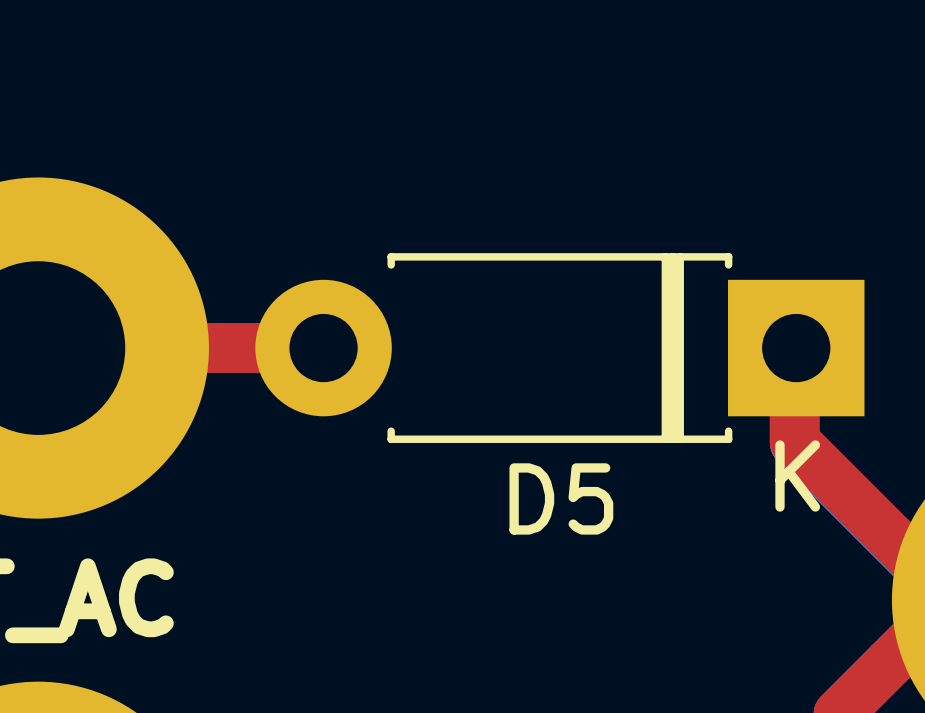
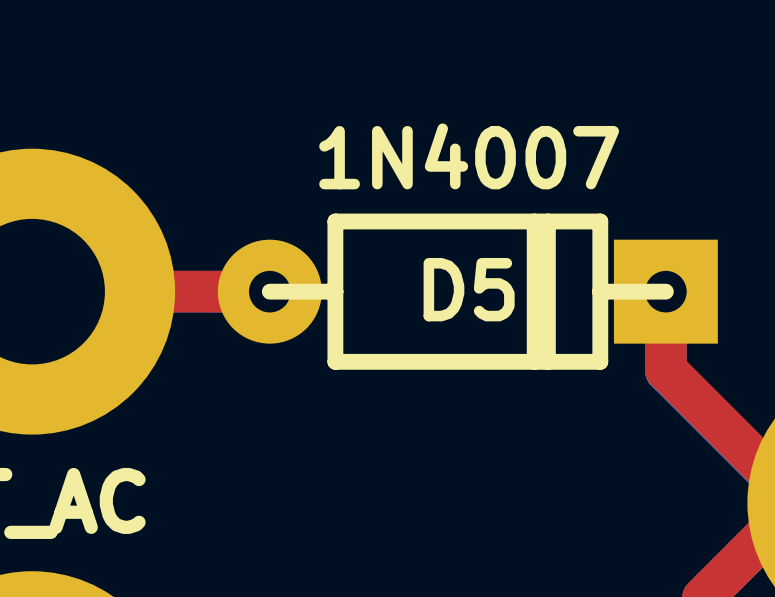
D5 value: none -> 1N4007 (469, 156)
D5 footprint: [255, 253, 865, 443] -> [217, 213, 718, 370]
D5 name position: D5 (561, 498) -> D5 (469, 289)

